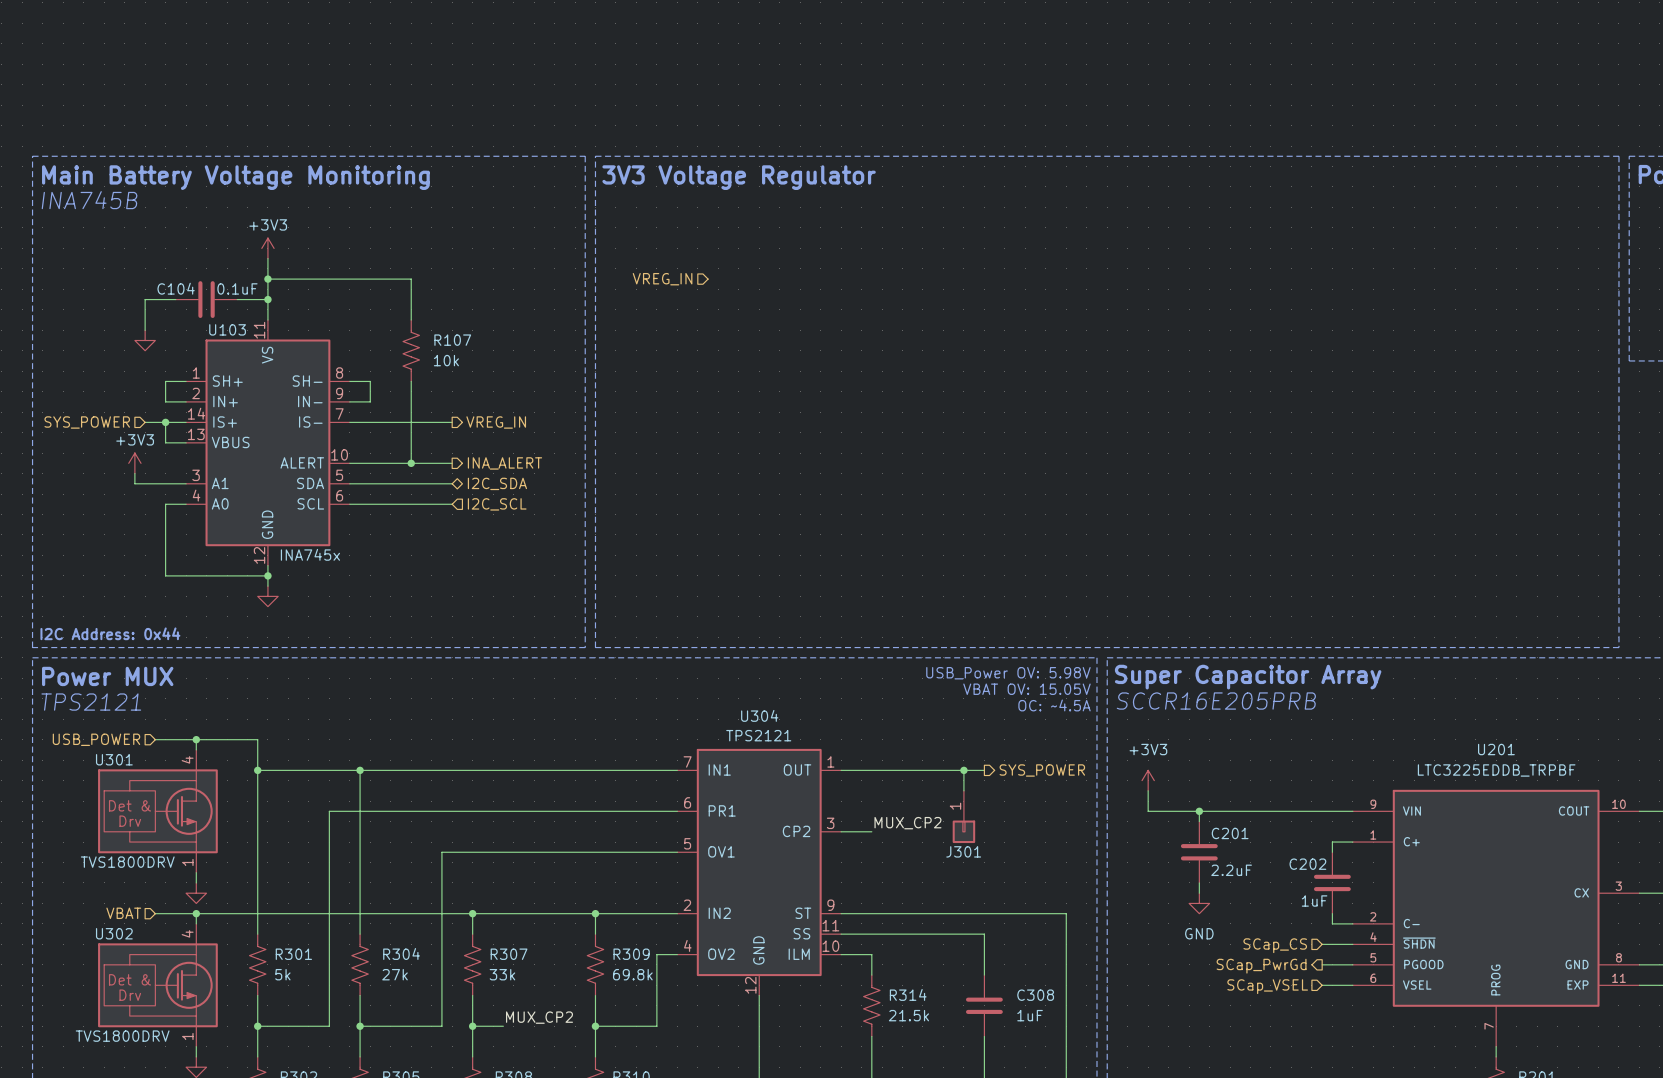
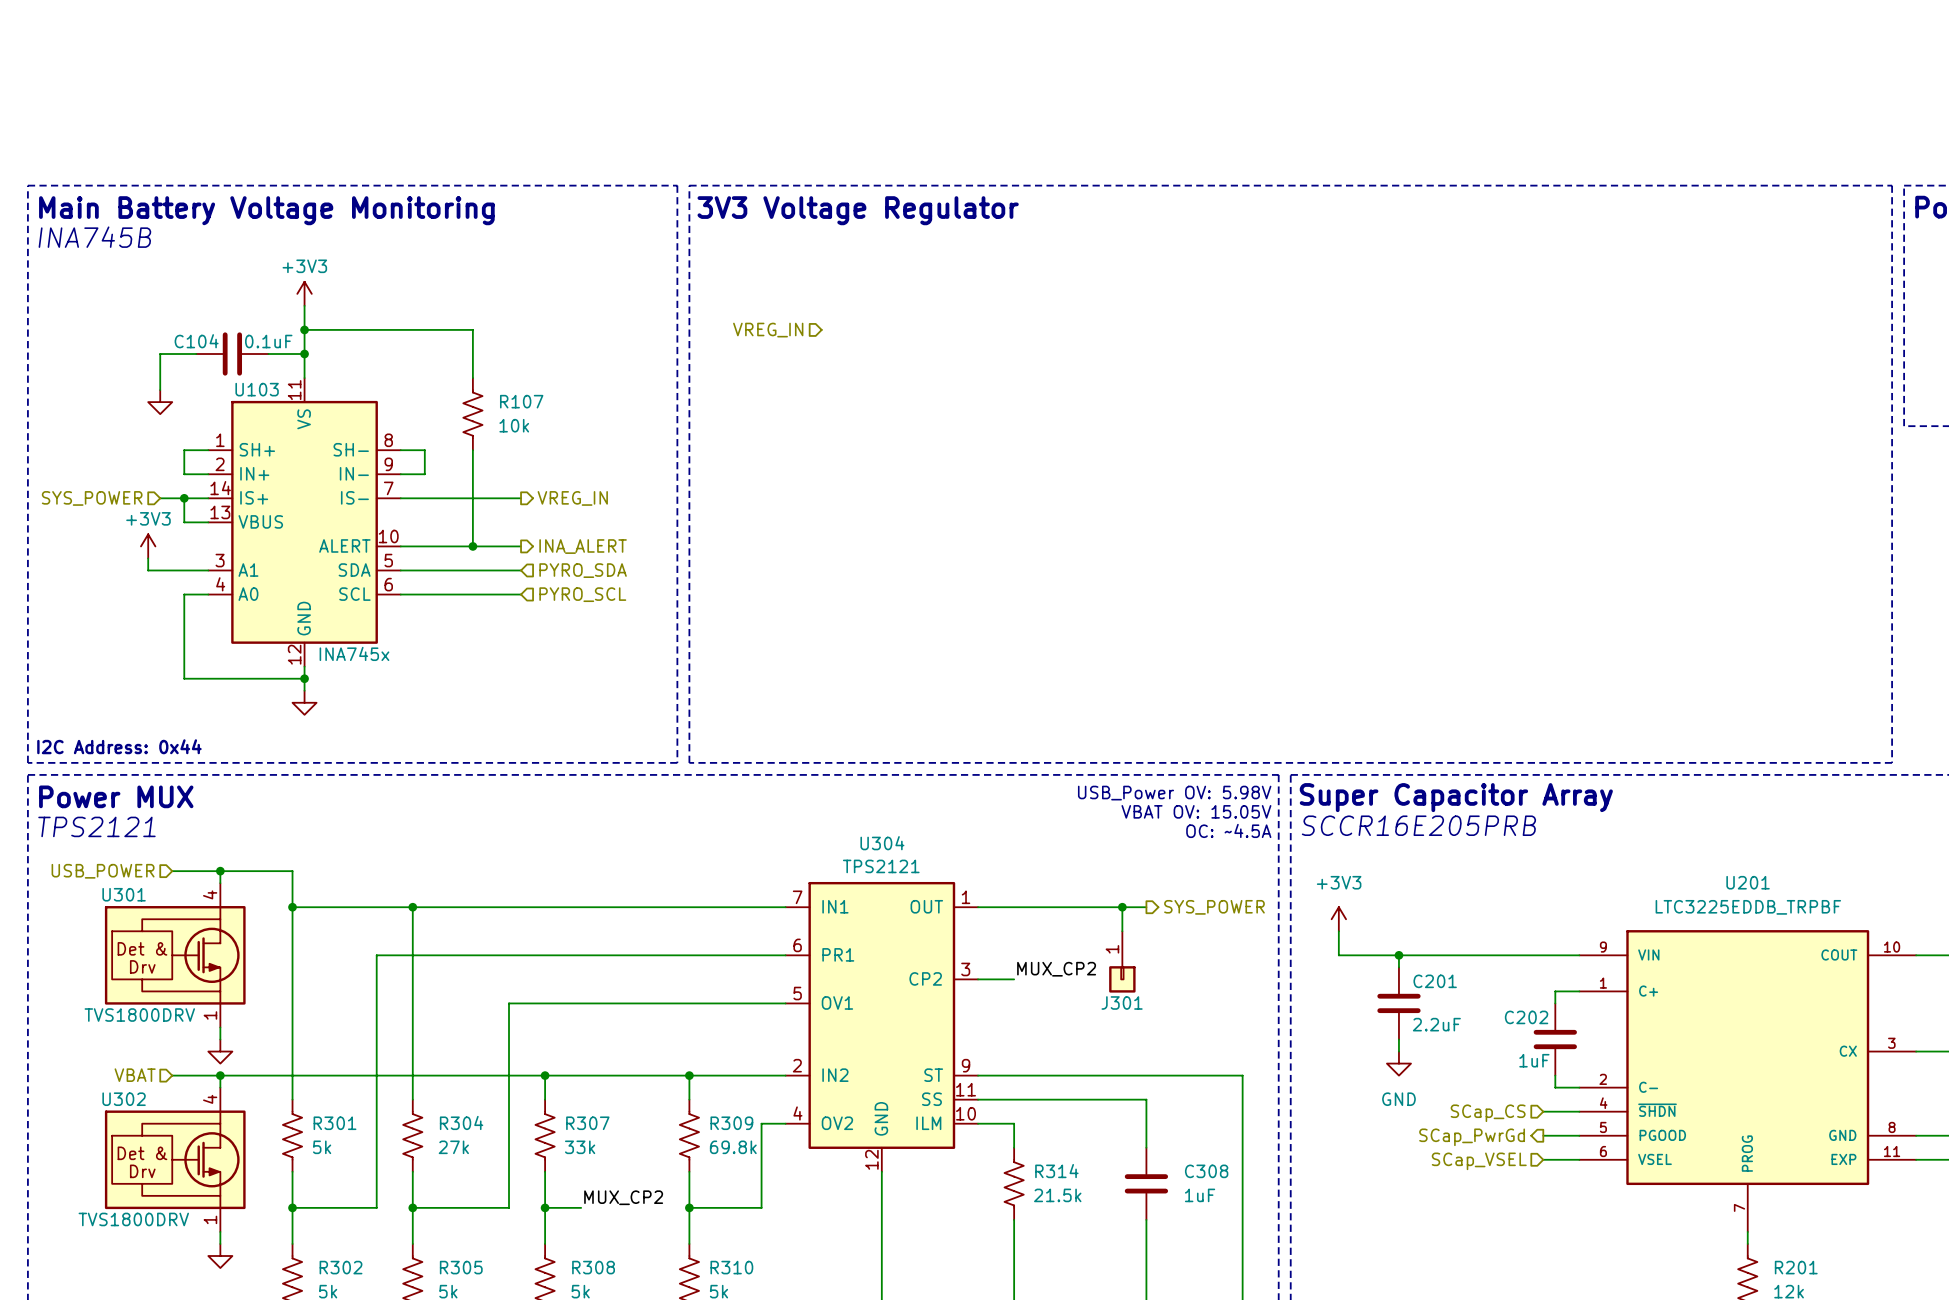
hierarchical label shape: bidirectional (497, 483) -> input (583, 570)
hierarchical label: I2C_SDA (497, 483) -> PYRO_SDA (583, 570)
hierarchical label: I2C_SCL (497, 504) -> PYRO_SCL (582, 594)

